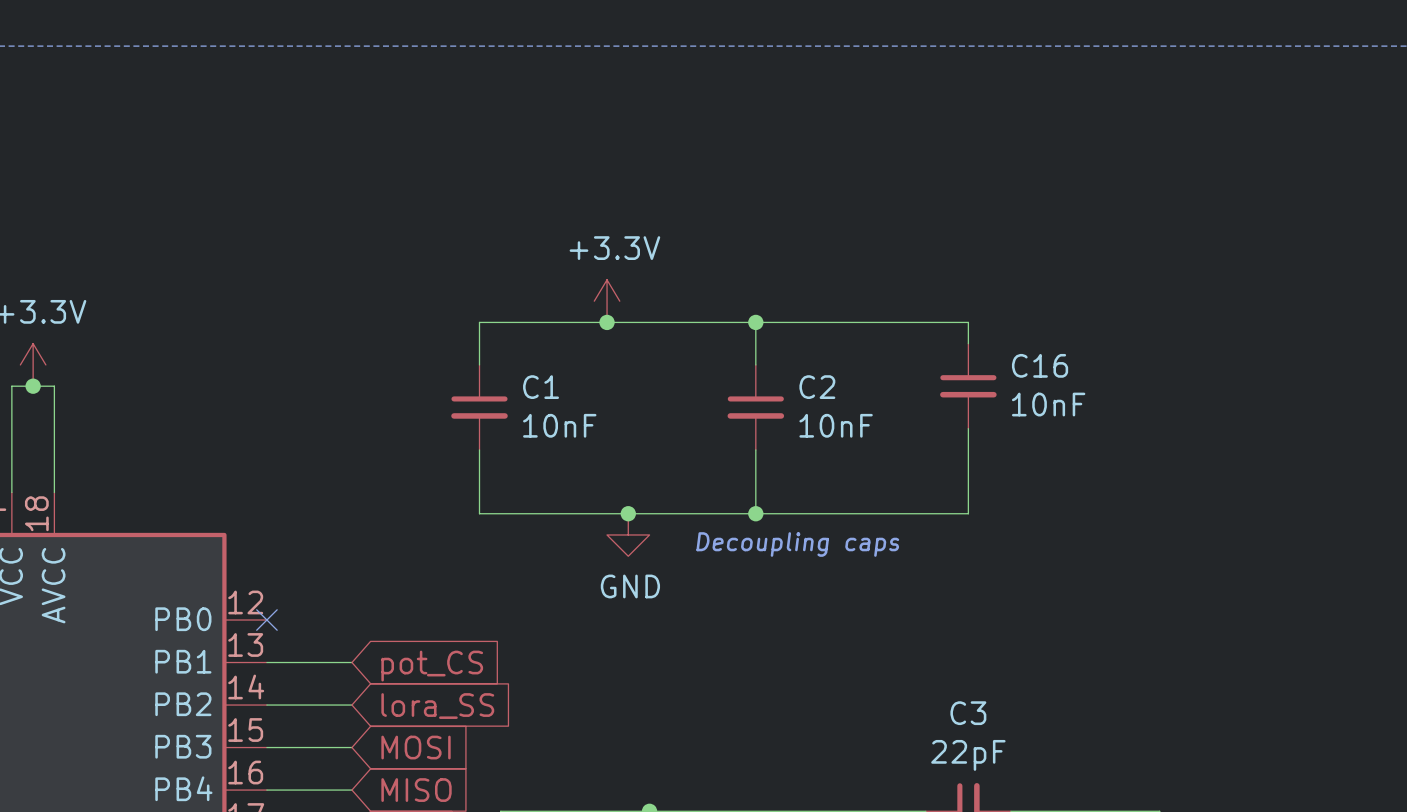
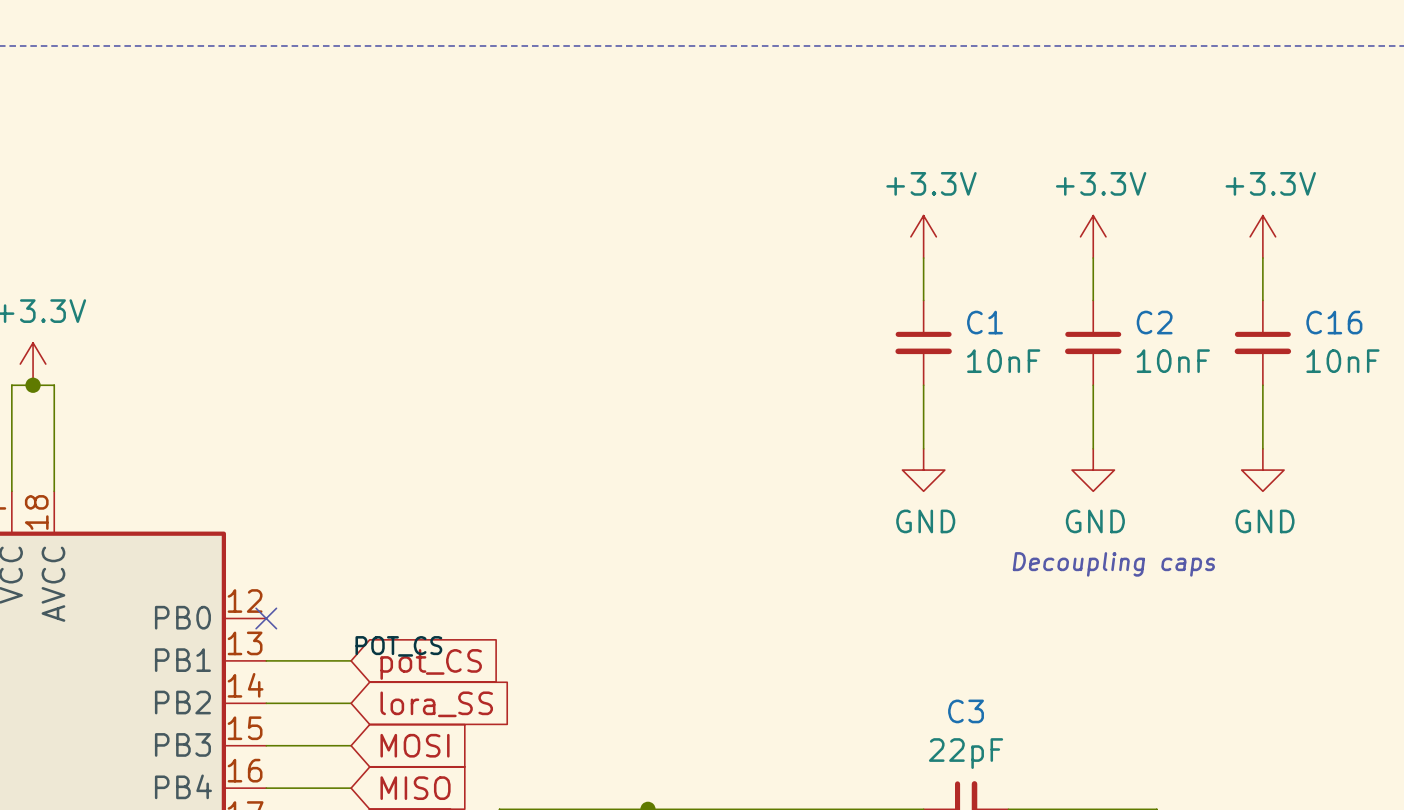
power symbol: none -> +3.3V (923, 236)
power symbol: none -> +3.3V (1093, 236)
power symbol: none -> +3.3V (1262, 236)
wire: none -> (1093, 258) (1093, 300)
wire: none -> (1262, 258) (1262, 300)
power symbol: +3.3V (607, 301) -> none
junction: (607, 322) -> none
wire: (755, 322) (755, 364) -> (923, 258) (923, 300)
junction: (755, 322) -> none
wire: (968, 343) (968, 322) (479, 322) (479, 364) -> none
C16 position: (968, 386) -> (1262, 342)
wire: none -> (1093, 385) (1093, 448)
wire: none -> (1262, 385) (1262, 448)
C1 position: (479, 407) -> (923, 342)
C2 position: (755, 407) -> (1093, 342)
wire: (968, 428) (968, 513) (479, 513) (479, 449) -> none
wire: (755, 449) (755, 513) -> (923, 385) (923, 448)
power symbol: none -> GND (923, 470)
power symbol: none -> GND (1093, 470)
power symbol: none -> GND (1262, 470)
junction: (628, 513) -> none
junction: (755, 513) -> none
power symbol: GND (628, 534) -> none
text position: Decoupling caps (797, 544) -> Decoupling caps (1113, 564)
label: none -> POT_CS (398, 646)

